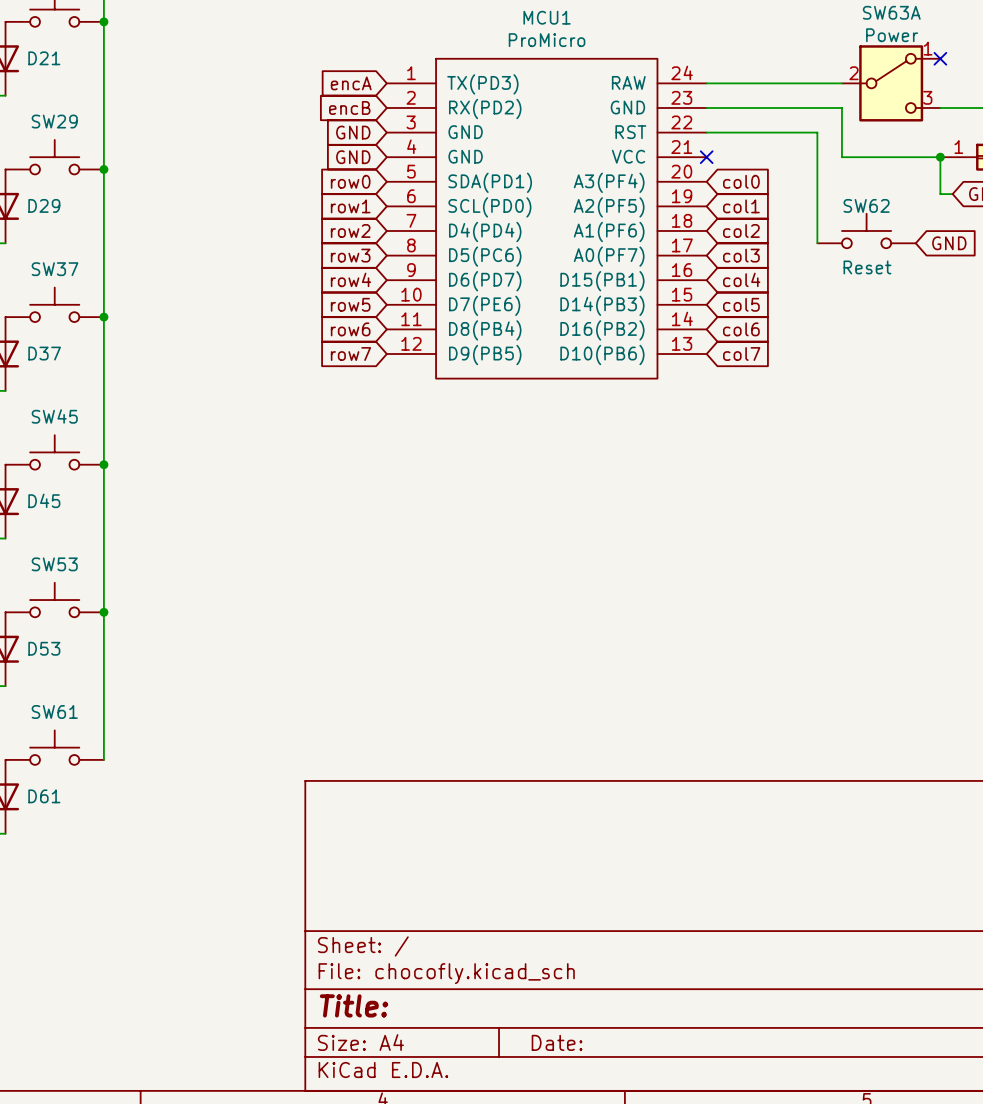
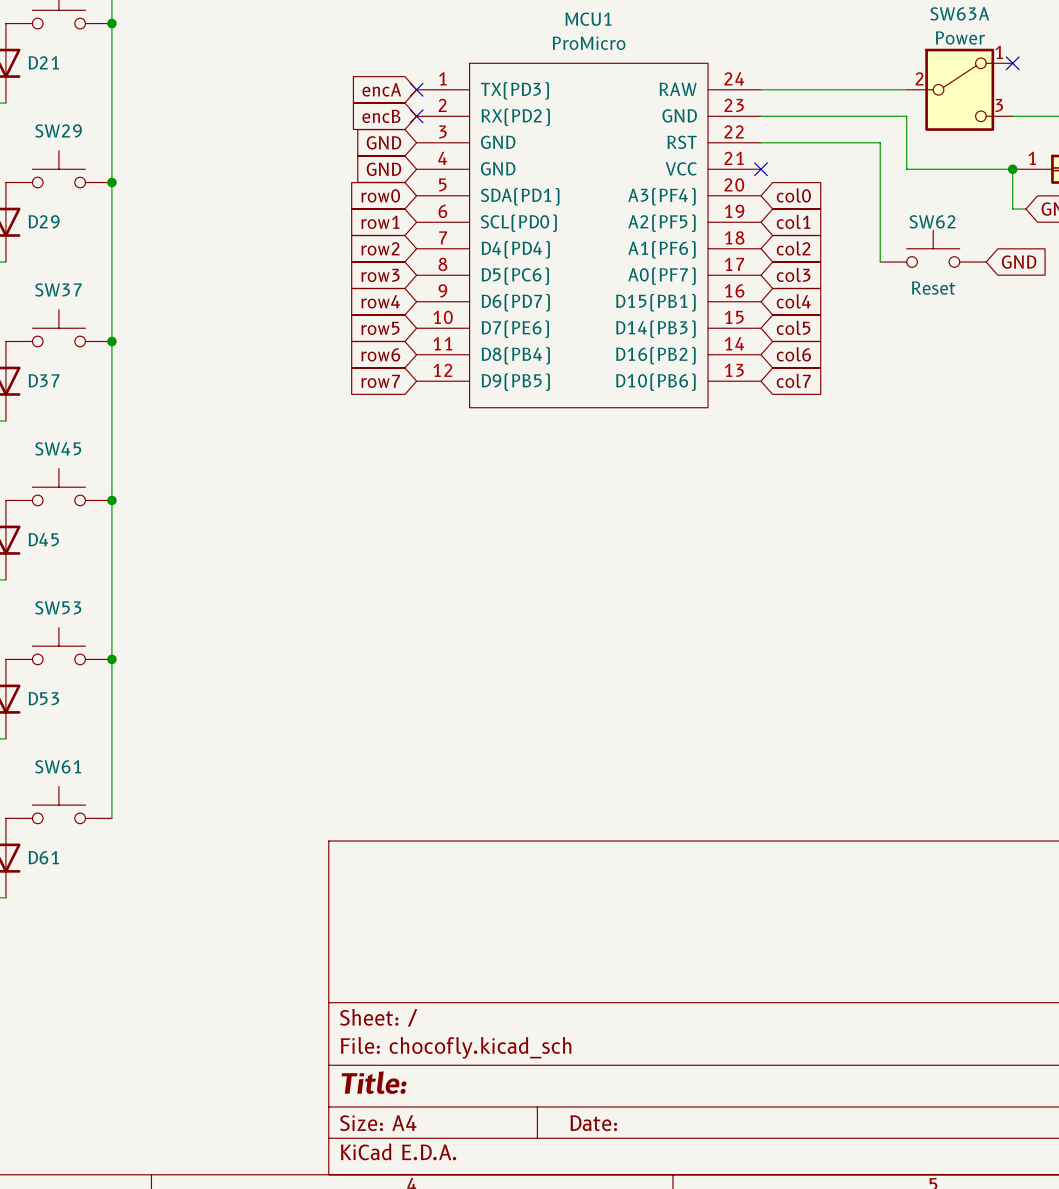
no-connect mark: none -> (416, 89)
no-connect mark: none -> (416, 116)

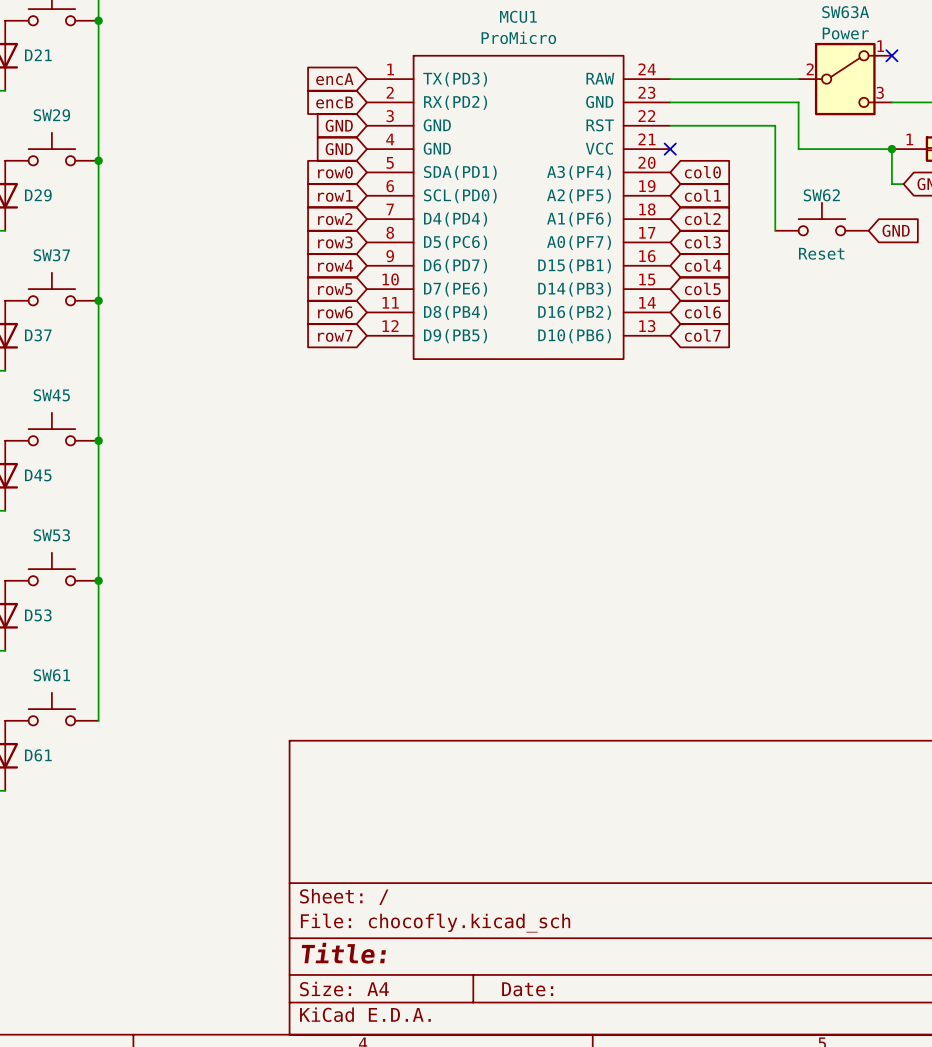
no-connect mark: (416, 89) -> none
no-connect mark: (416, 116) -> none

